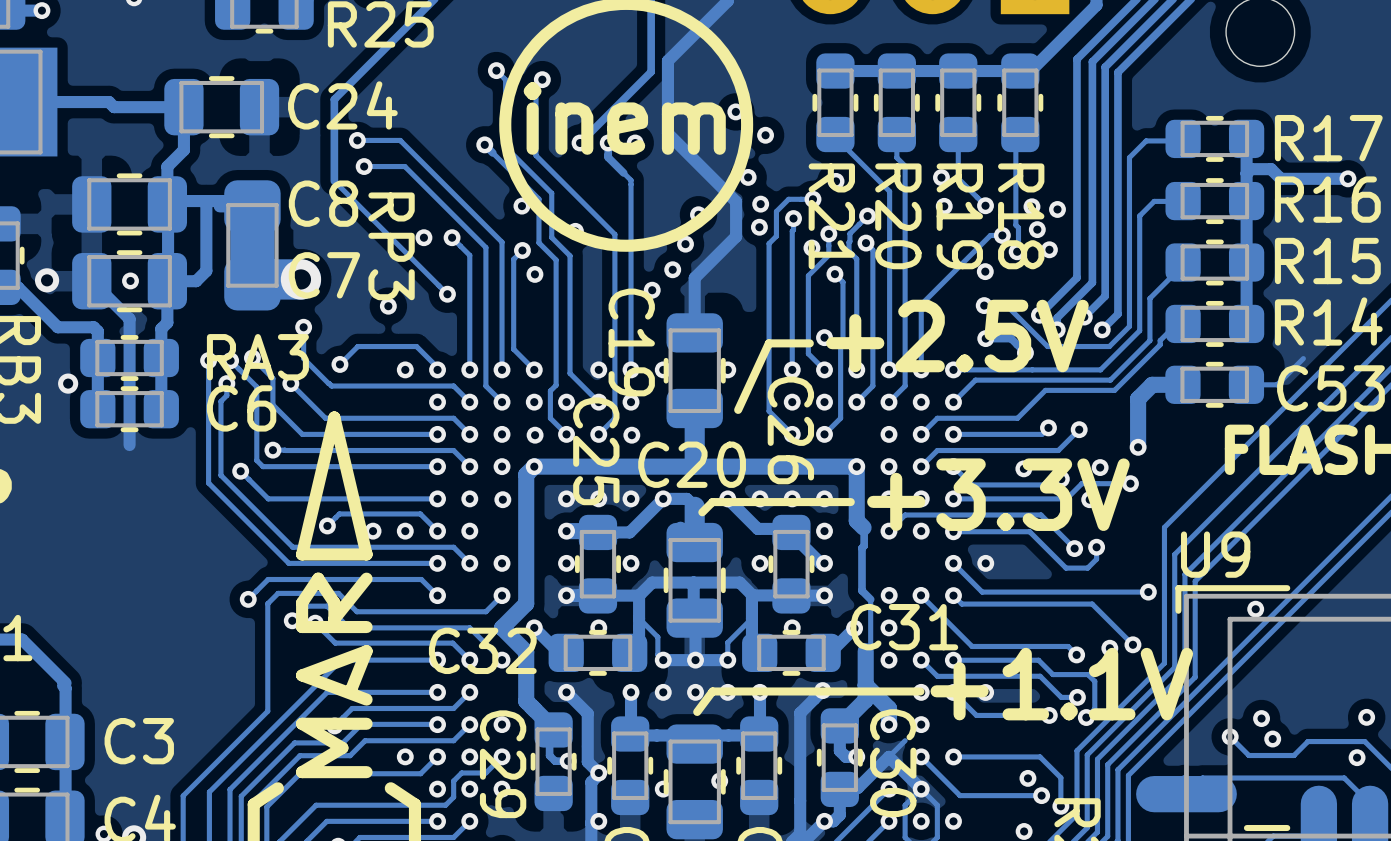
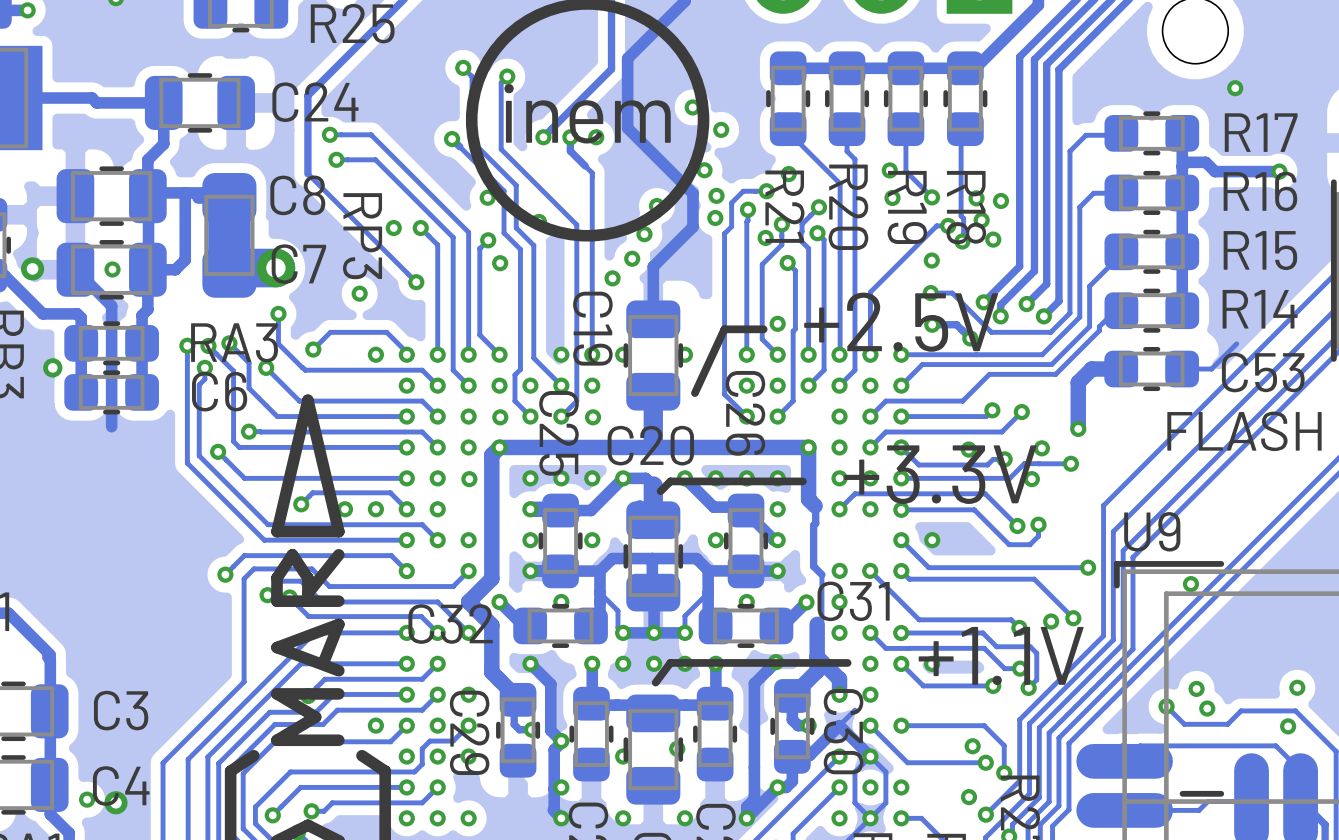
via: none -> (1235, 88)
line: (920, 691) (897, 691) -> none

